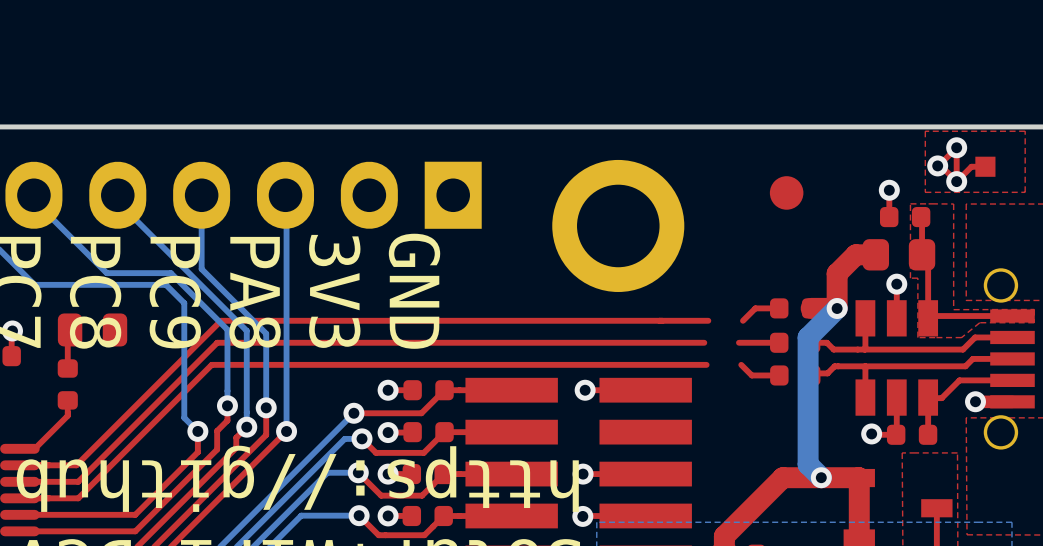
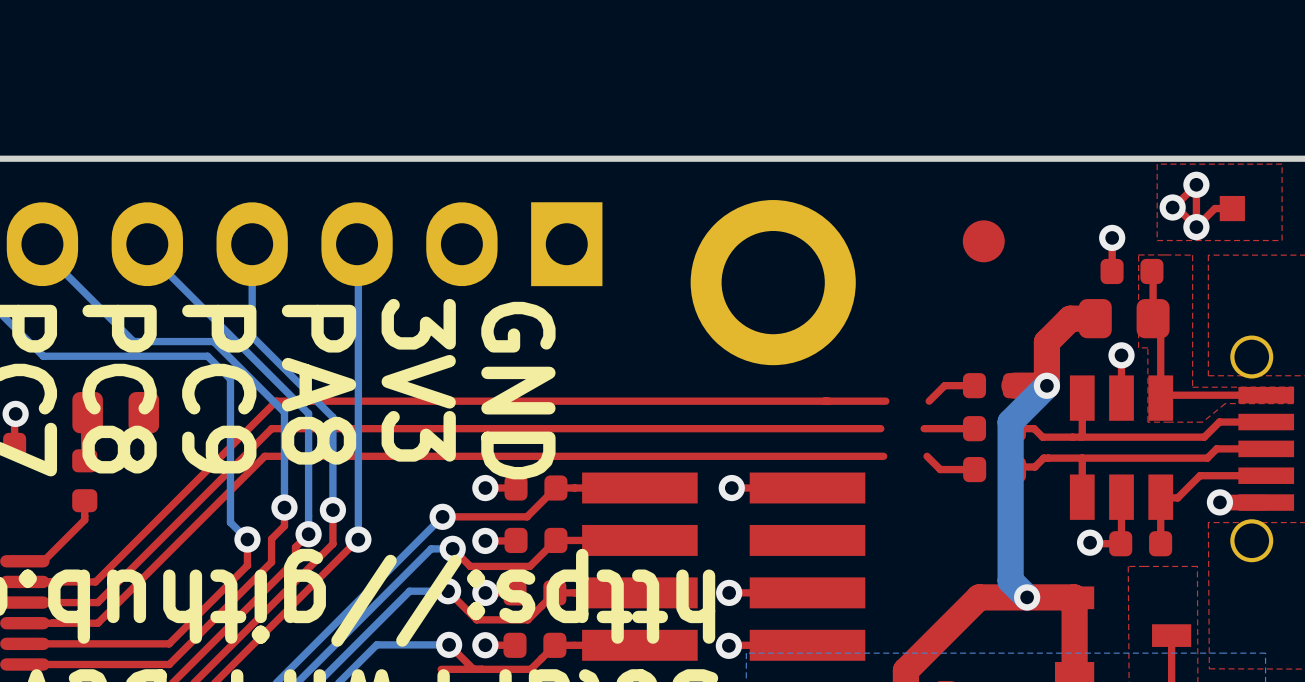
top track: none -> (473, 669) (441, 669)

